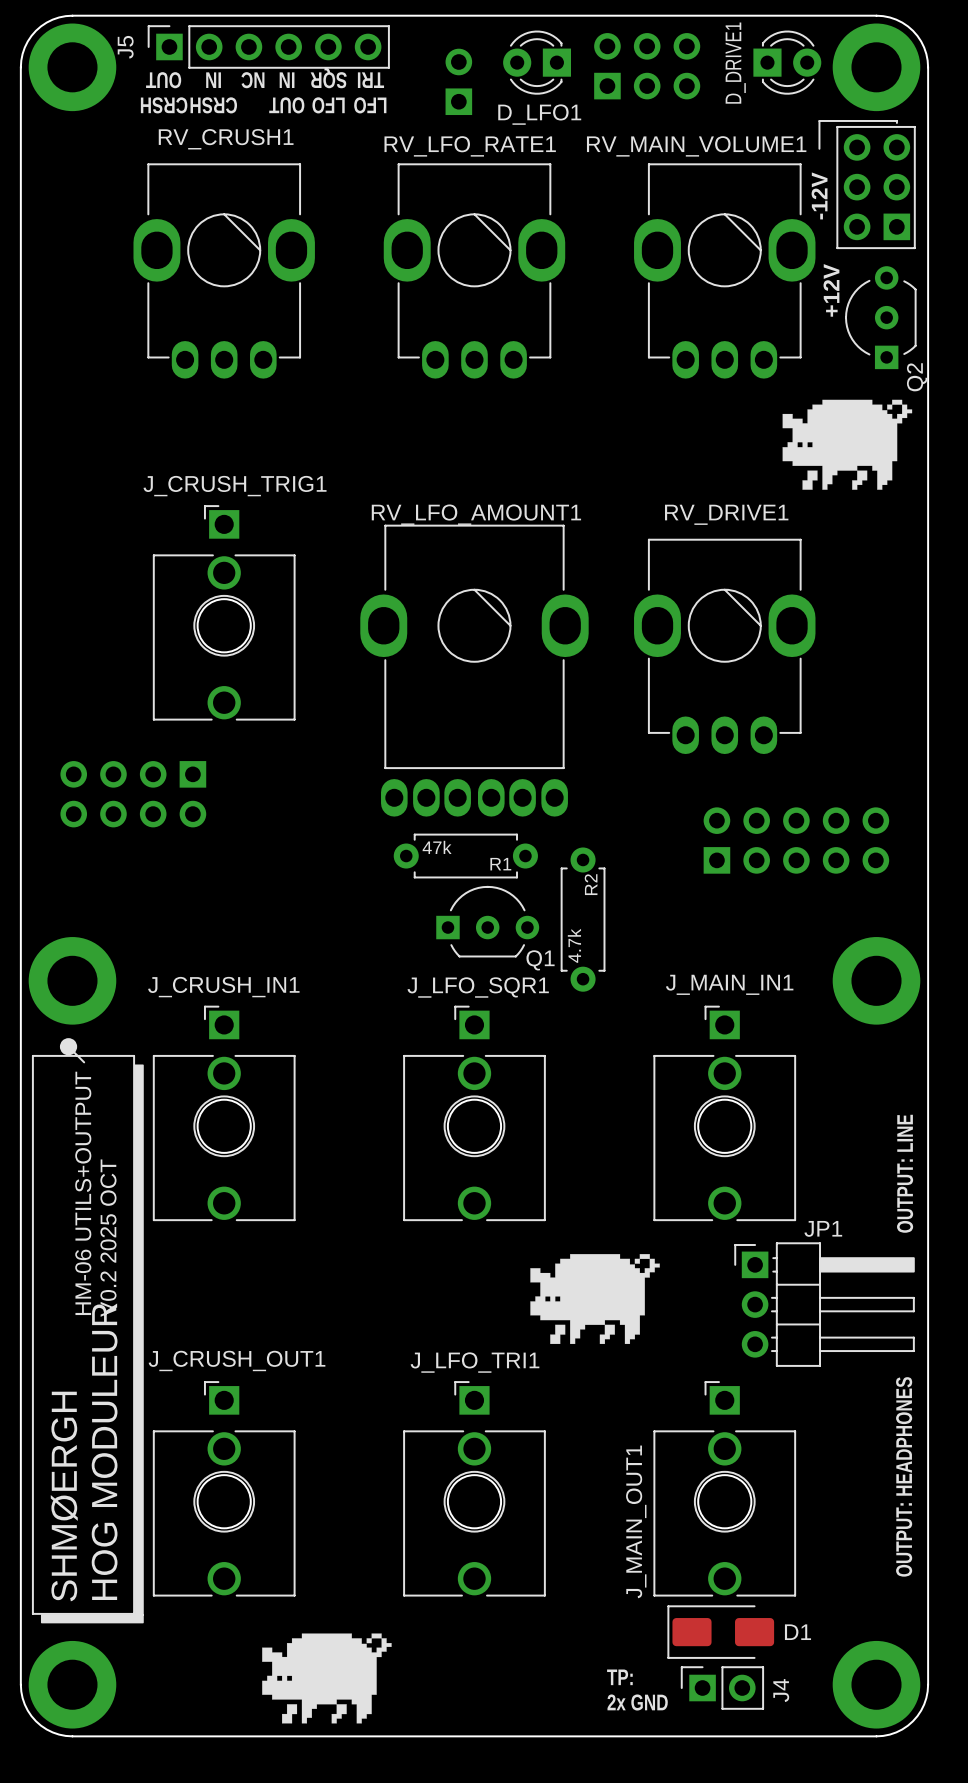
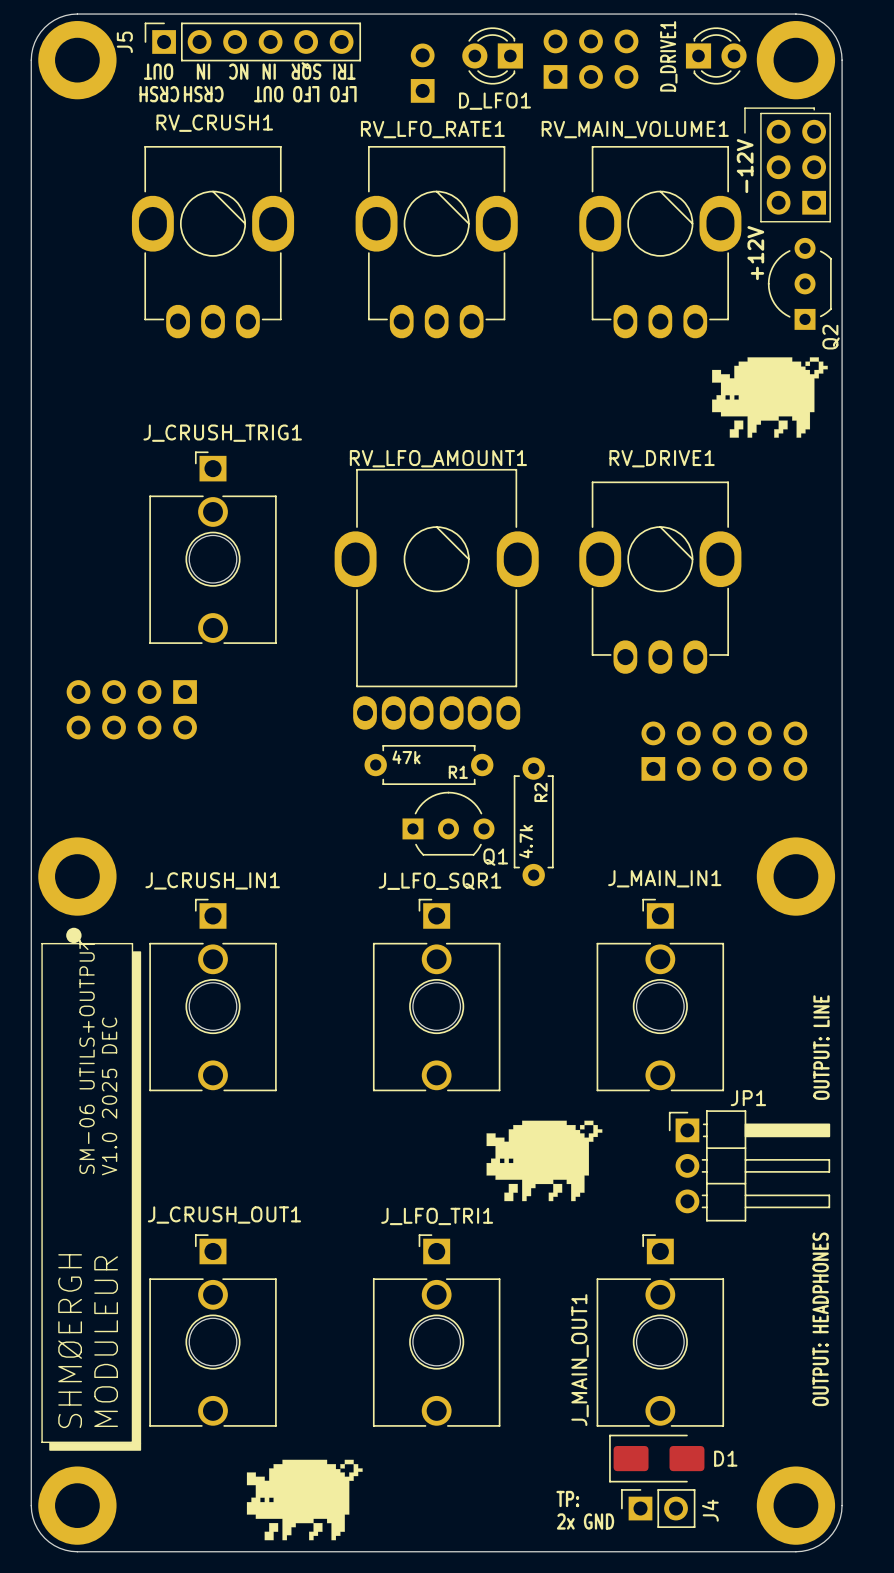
text: HM-06 UTILS+OUTPUT (83, 1193) -> SM-06 UTILS+OUTPUT (87, 1056)
text: V0.2 2025 OCT (108, 1238) -> V1.0 2025 DEC (109, 1096)
text: HOG MODULEUR (104, 1451) -> MODULEUR (106, 1341)

